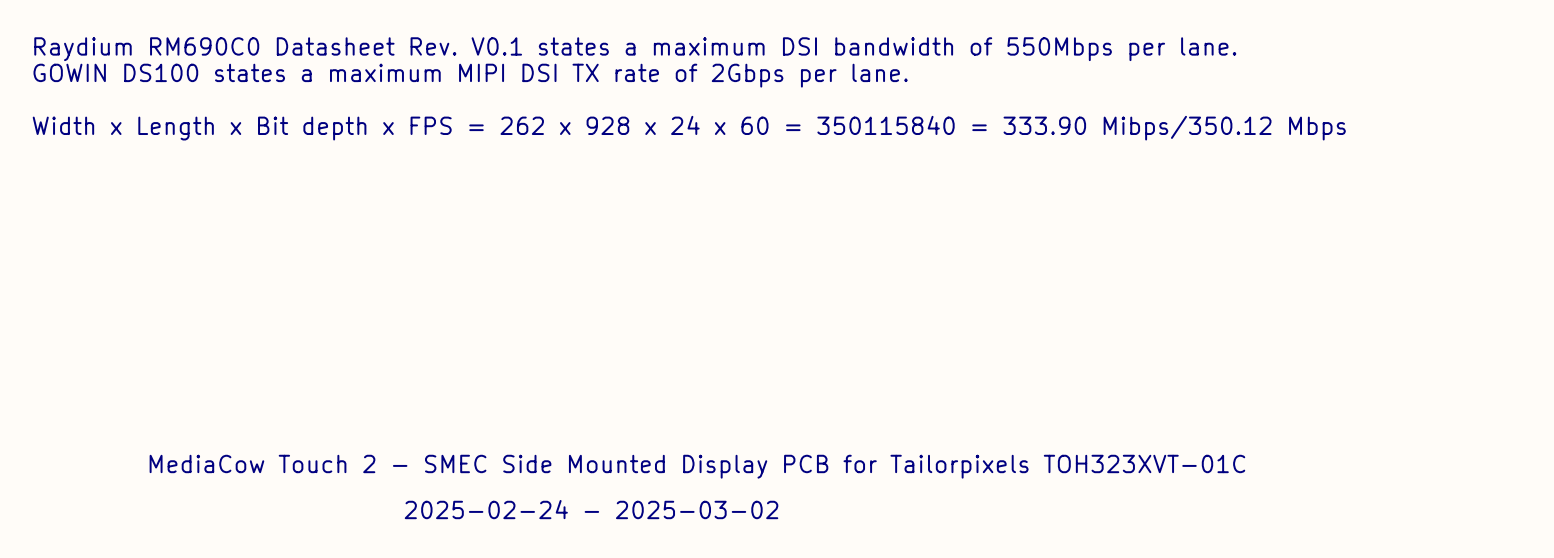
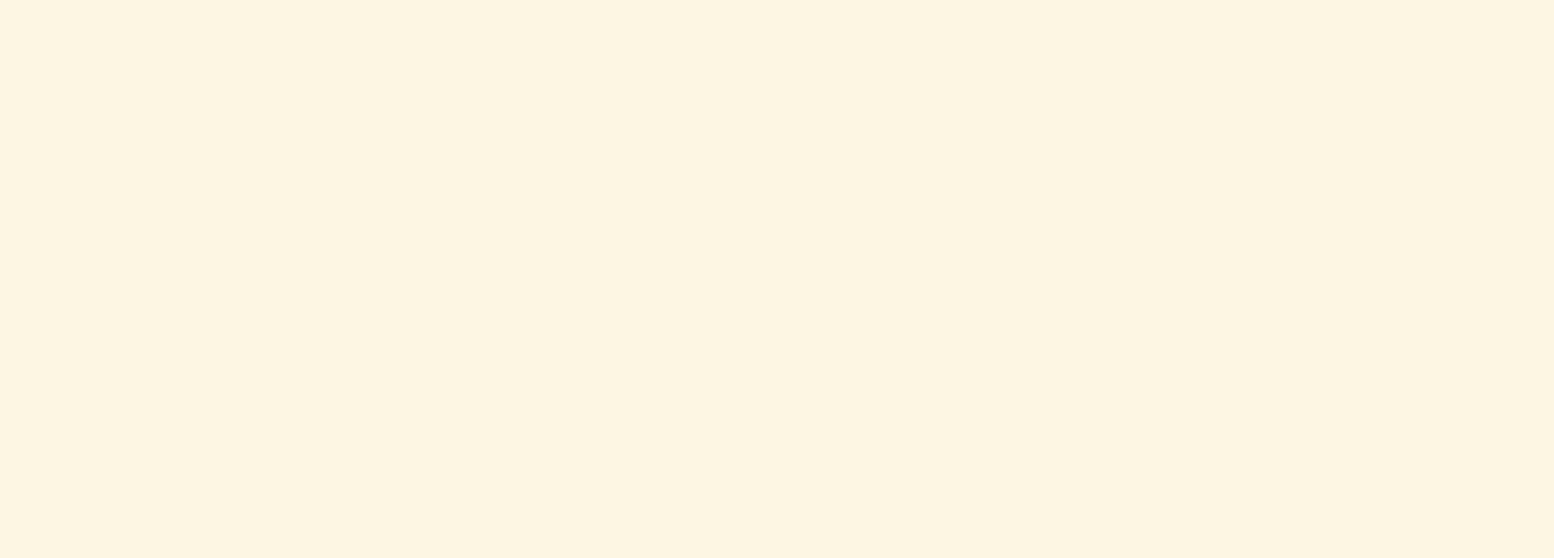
text: Raydium RM690C0 Datasheet Rev. V0.1 states a maximum DSI bandwidth of 550Mbps per lane. (635, 49) -> none
text: GOWIN DS100 states a maximum MIPI DSI TX rate of 2Gbps per lane. (470, 75) -> none
text: Width x Length x Bit depth x FPS = 262 x 928 x 24 x 60 = 350115840 = 333.90 Mibps/350.12 Mbps (689, 128) -> none
text: MediaCow Touch 2 - SMEC Side Mounted Display PCB for Tailorpixels TOH323XVT-01C (697, 466) -> none
text: 2025-02-24 - 2025-03-02 (591, 509) -> none

